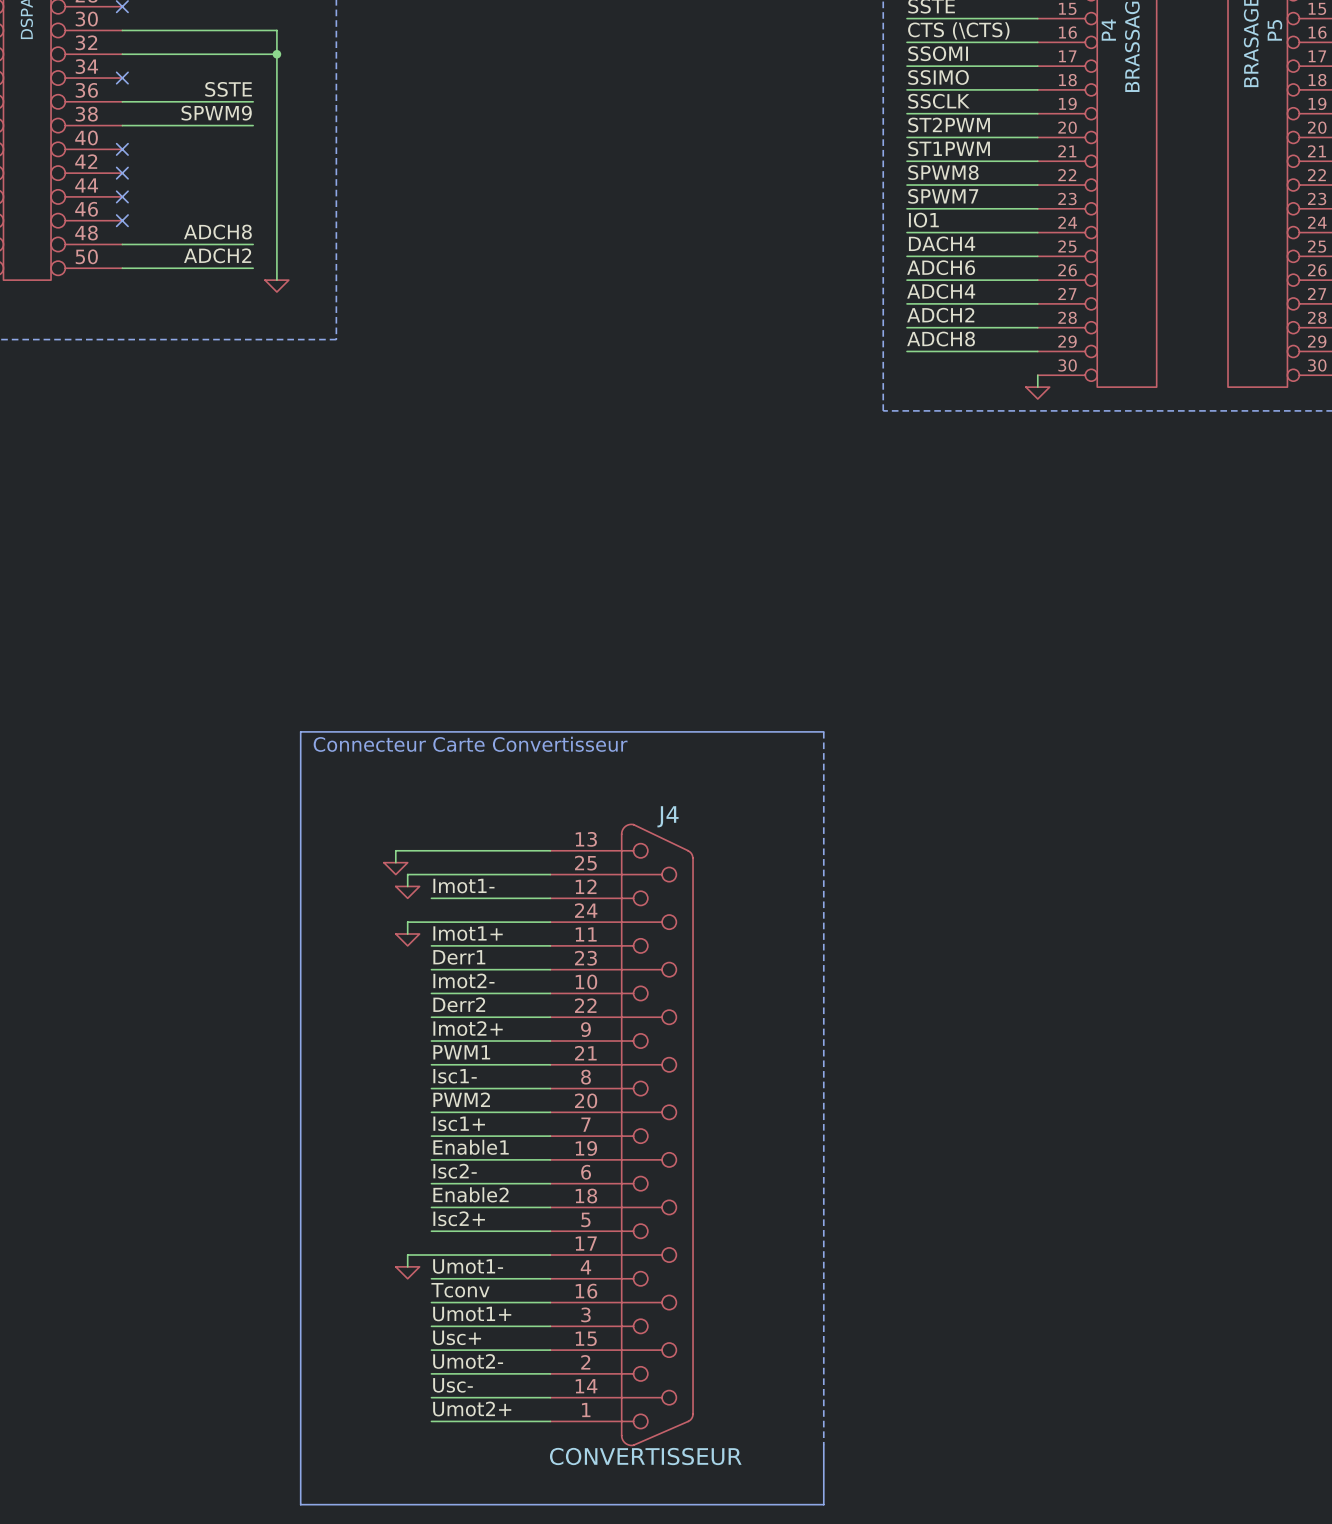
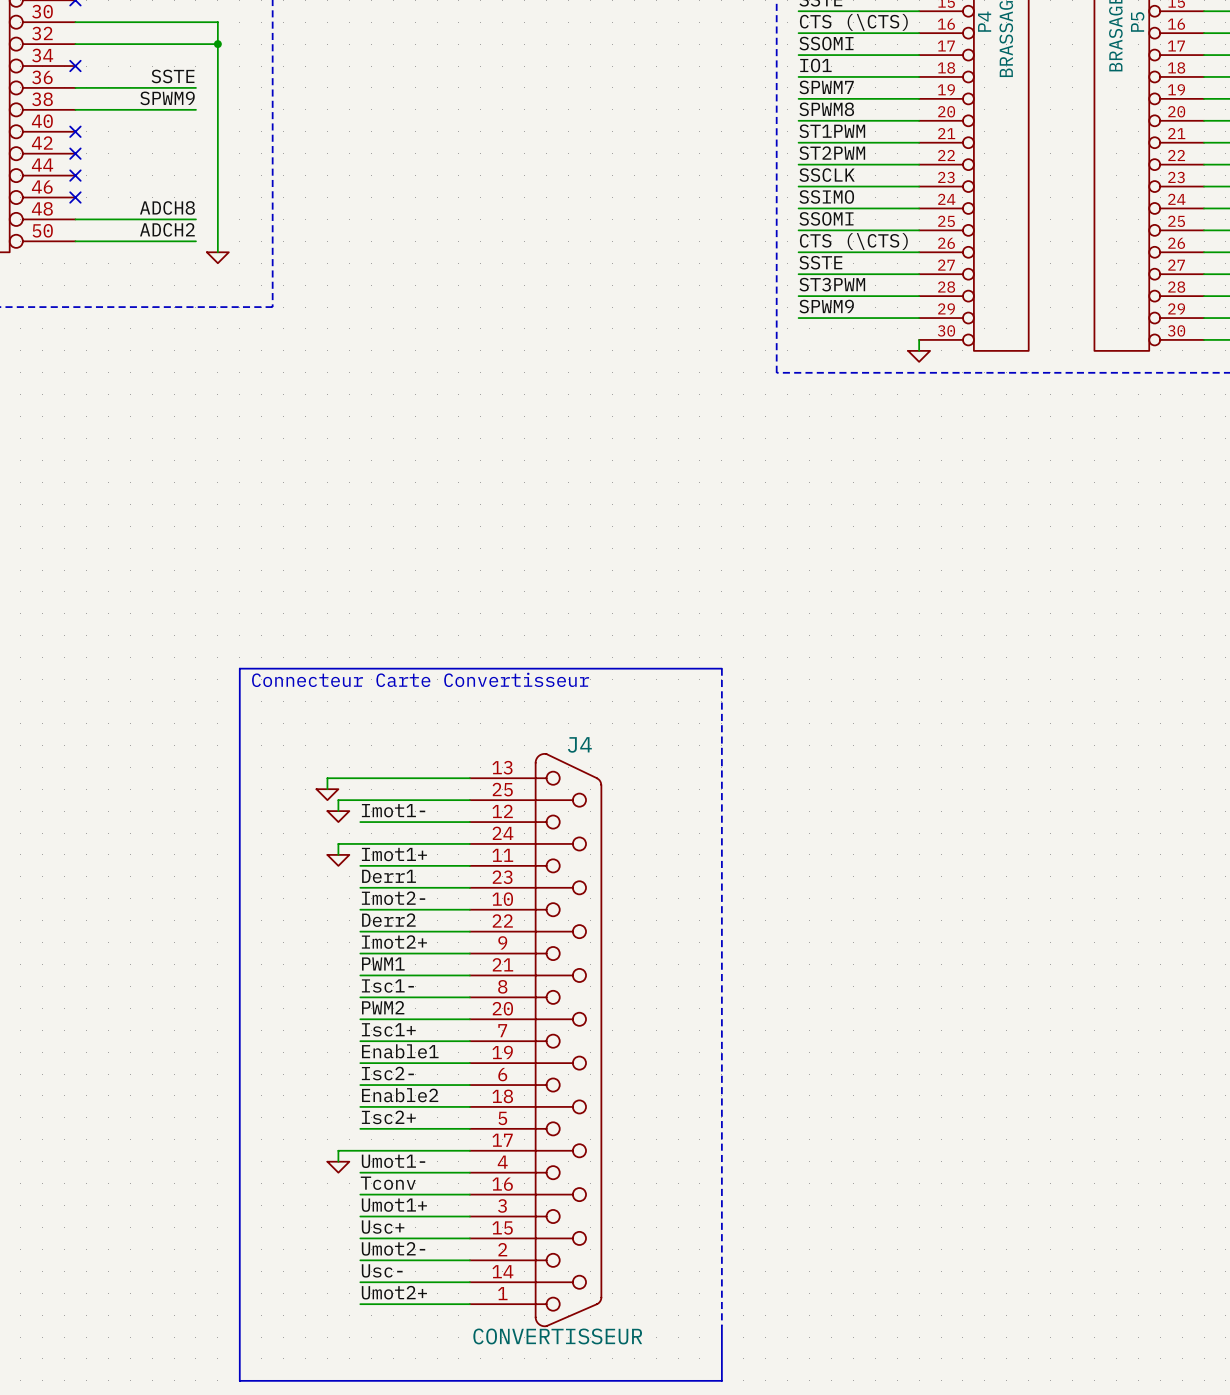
label: SSIMO (938, 77) -> IO1 (815, 65)
label: SSCLK (938, 101) -> SPWM7 (826, 87)
label: ST2PWM (949, 125) -> SPWM8 (826, 109)
label: SPWM8 (943, 172) -> ST2PWM (832, 153)
label: SPWM7 (943, 196) -> SSCLK (827, 175)
label: IO1 (923, 220) -> SSIMO (826, 196)
label: DACH4 (942, 243) -> SSOMI (826, 218)
label: ADCH6 (941, 267) -> CTS (\CTS) (853, 241)
label: ADCH4 (941, 291) -> SSTE (820, 262)
label: ADCH2 (940, 315) -> ST3PWM (832, 284)
label: ADCH8 (941, 339) -> SPWM9 (826, 306)

